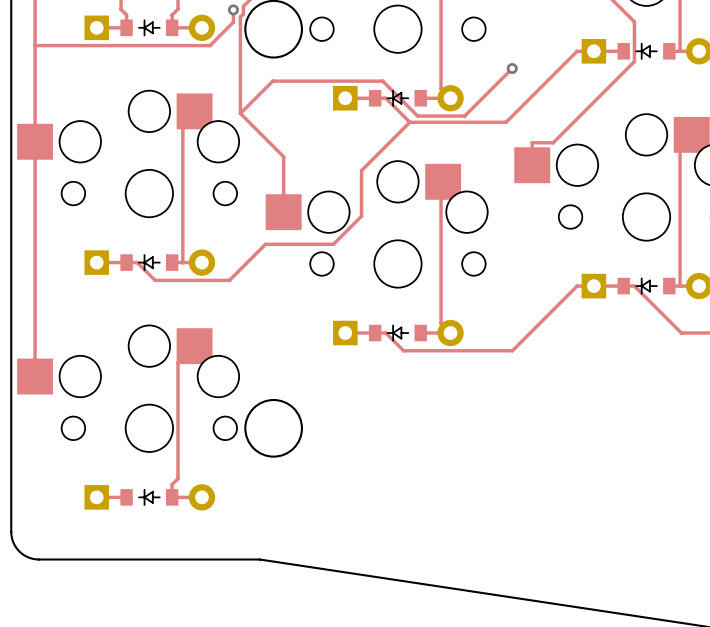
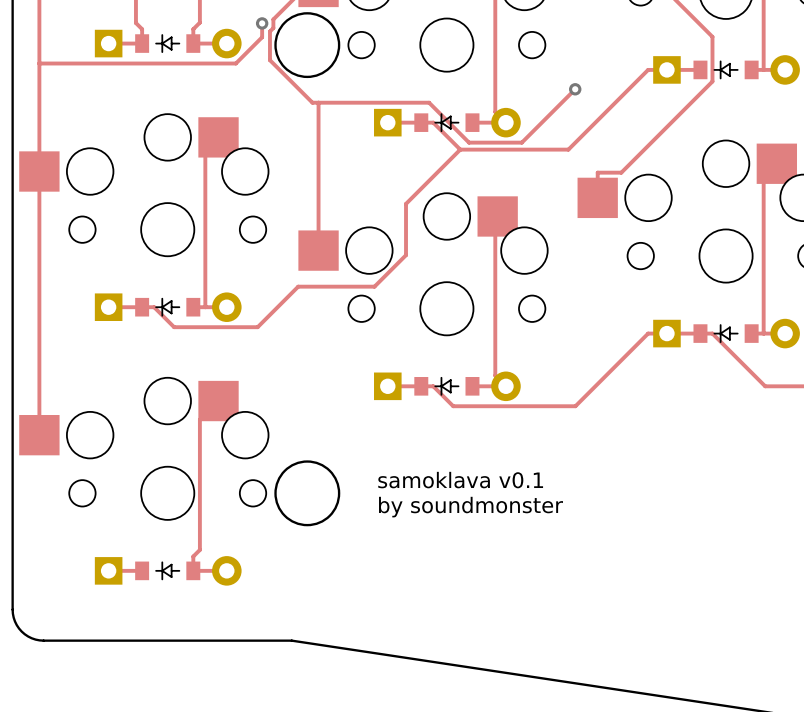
track: (240, 42) (240, 113) -> none
track: (382, 81) (272, 81) (240, 113) -> (429, 103) (312, 102) (269, 60)
track: (240, 113) (283, 156) -> (318, 102) (318, 188)
text: none -> samoklava v0.1 (460, 480)
text: none -> by soundmonster (471, 507)

